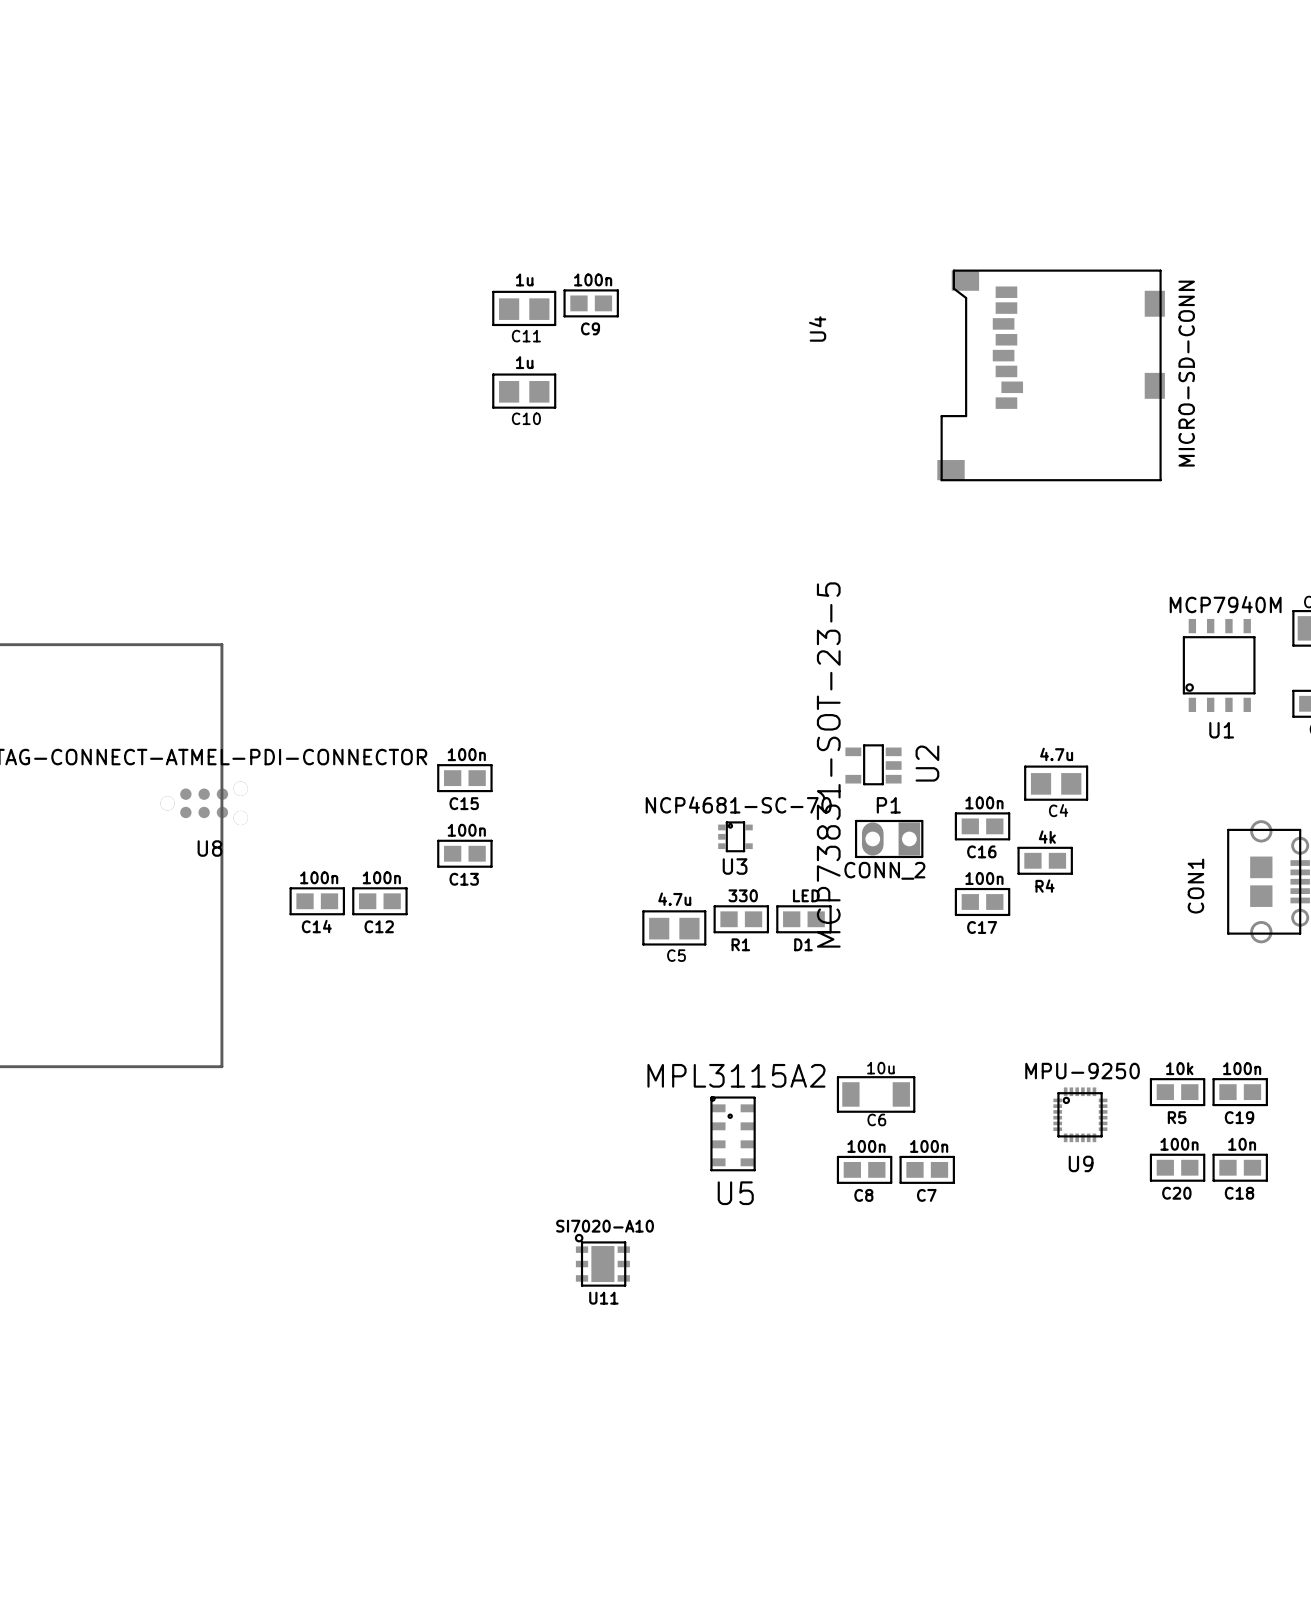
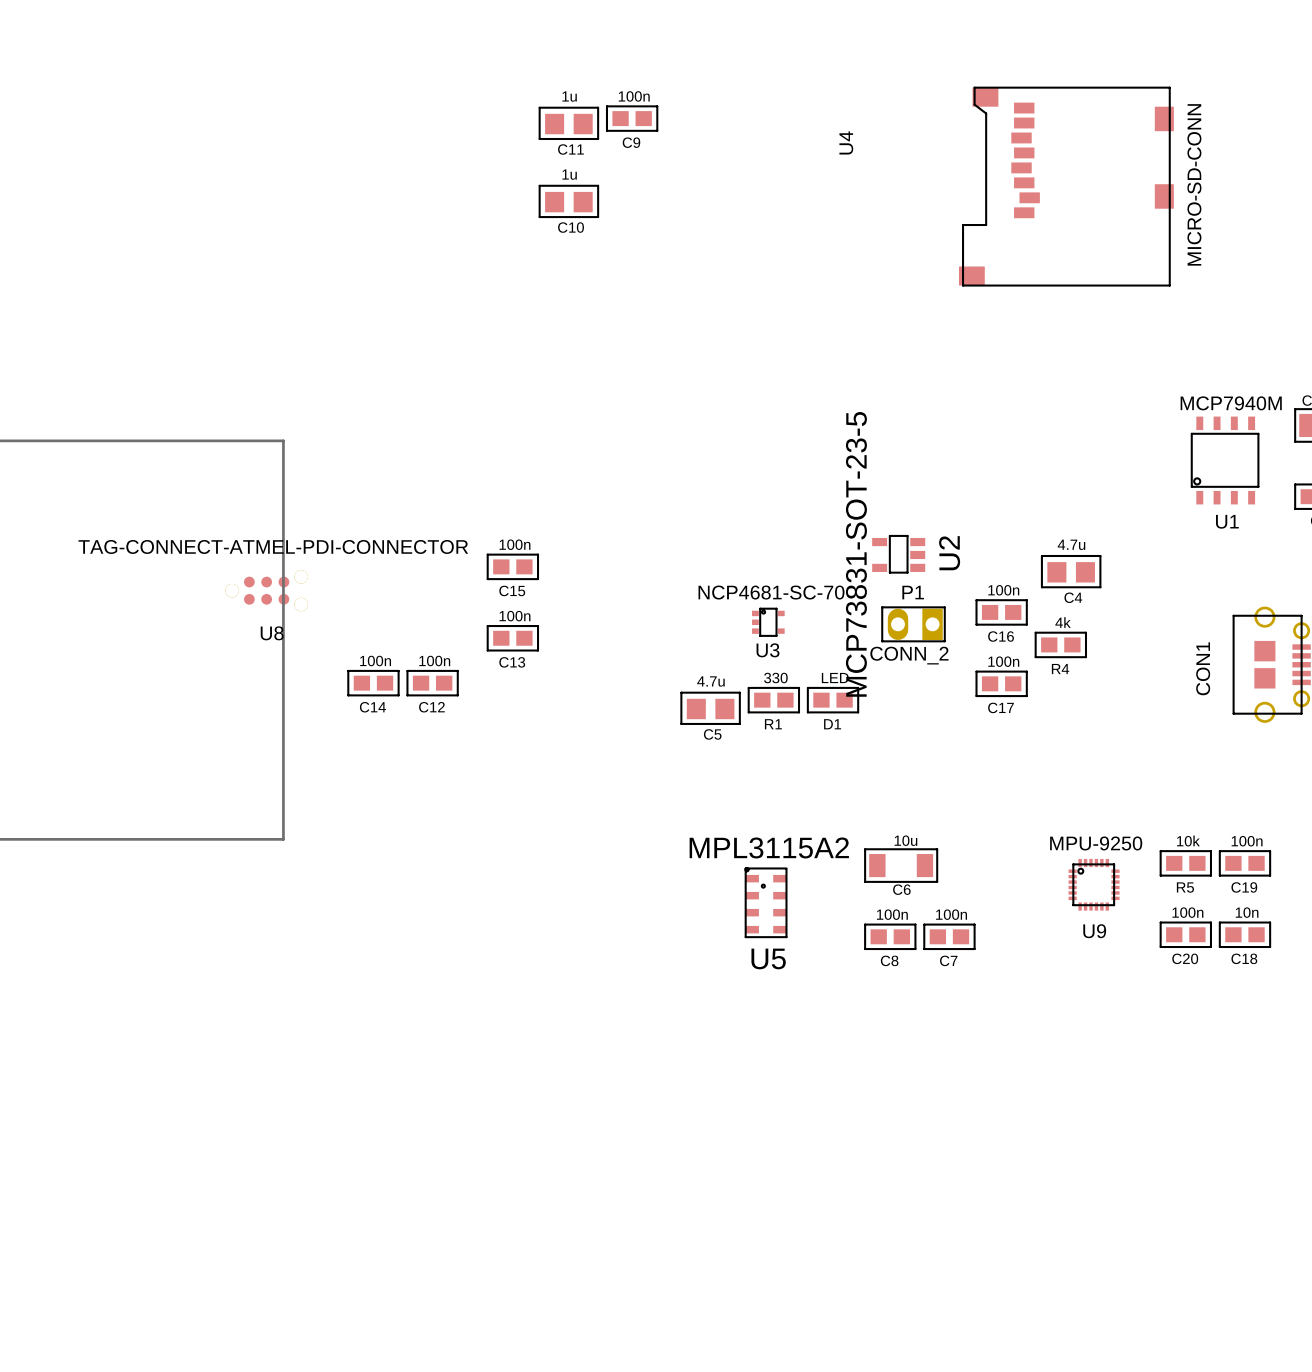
U11: SI7020-A10 (602, 1260) -> none

